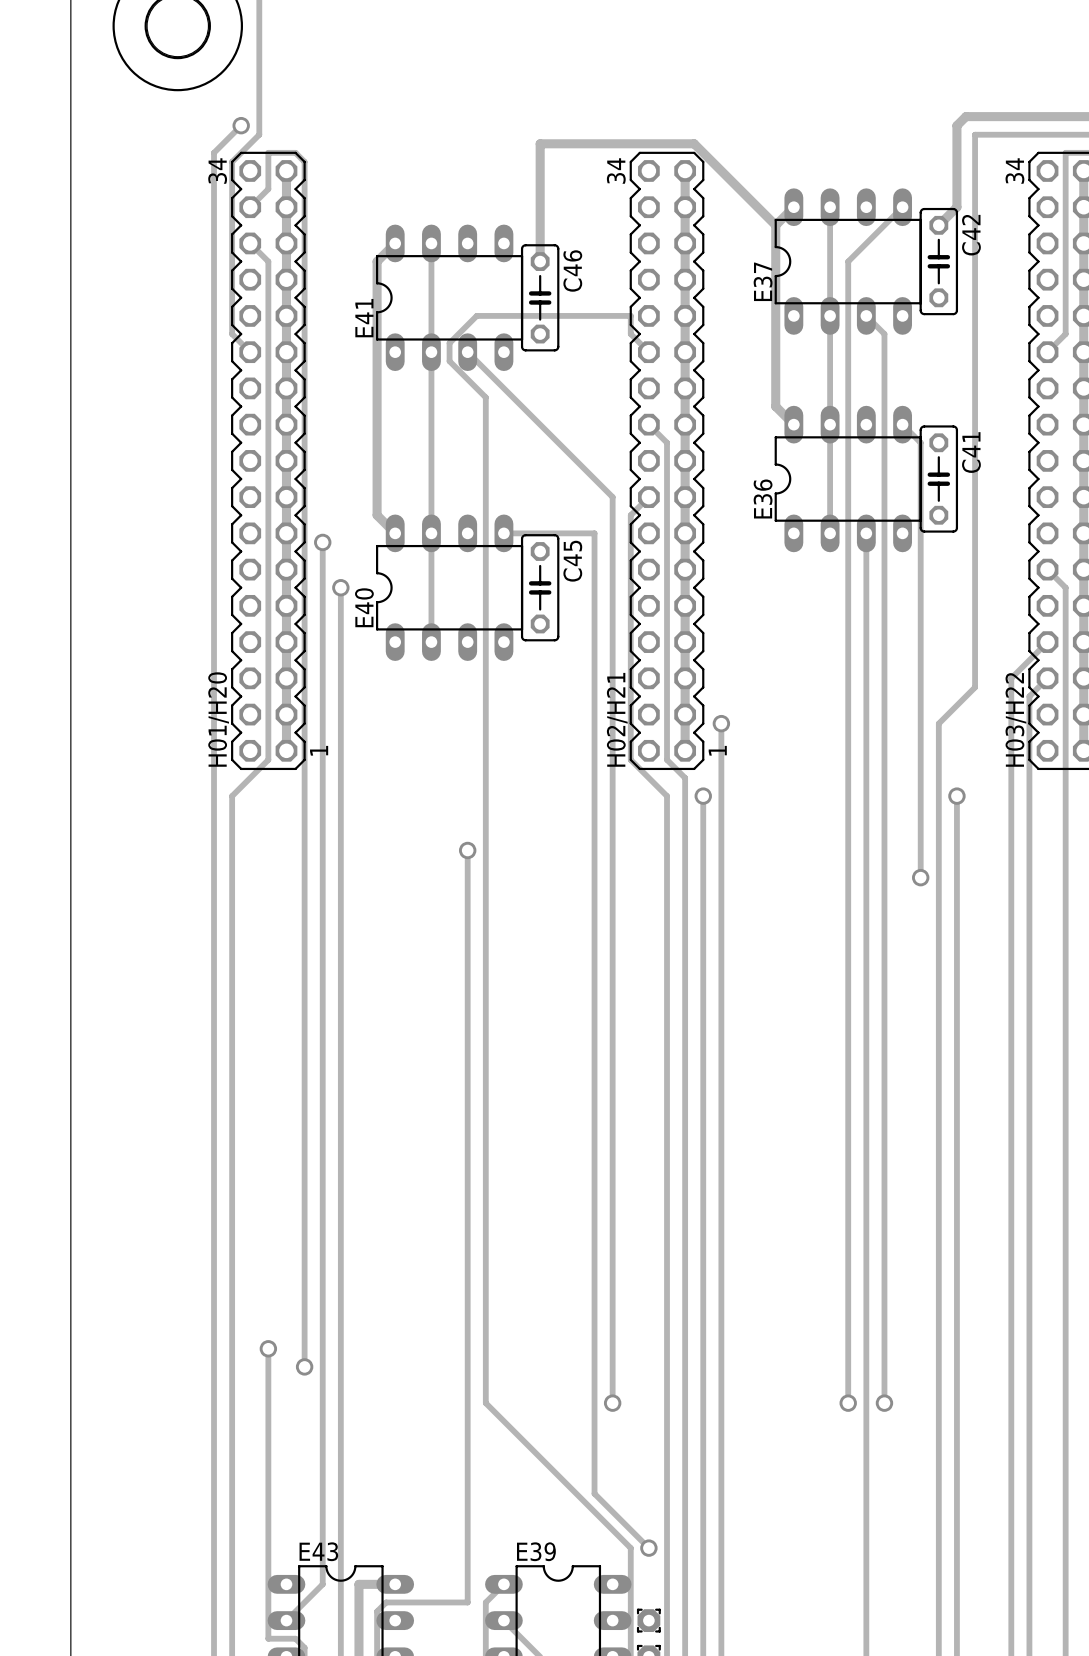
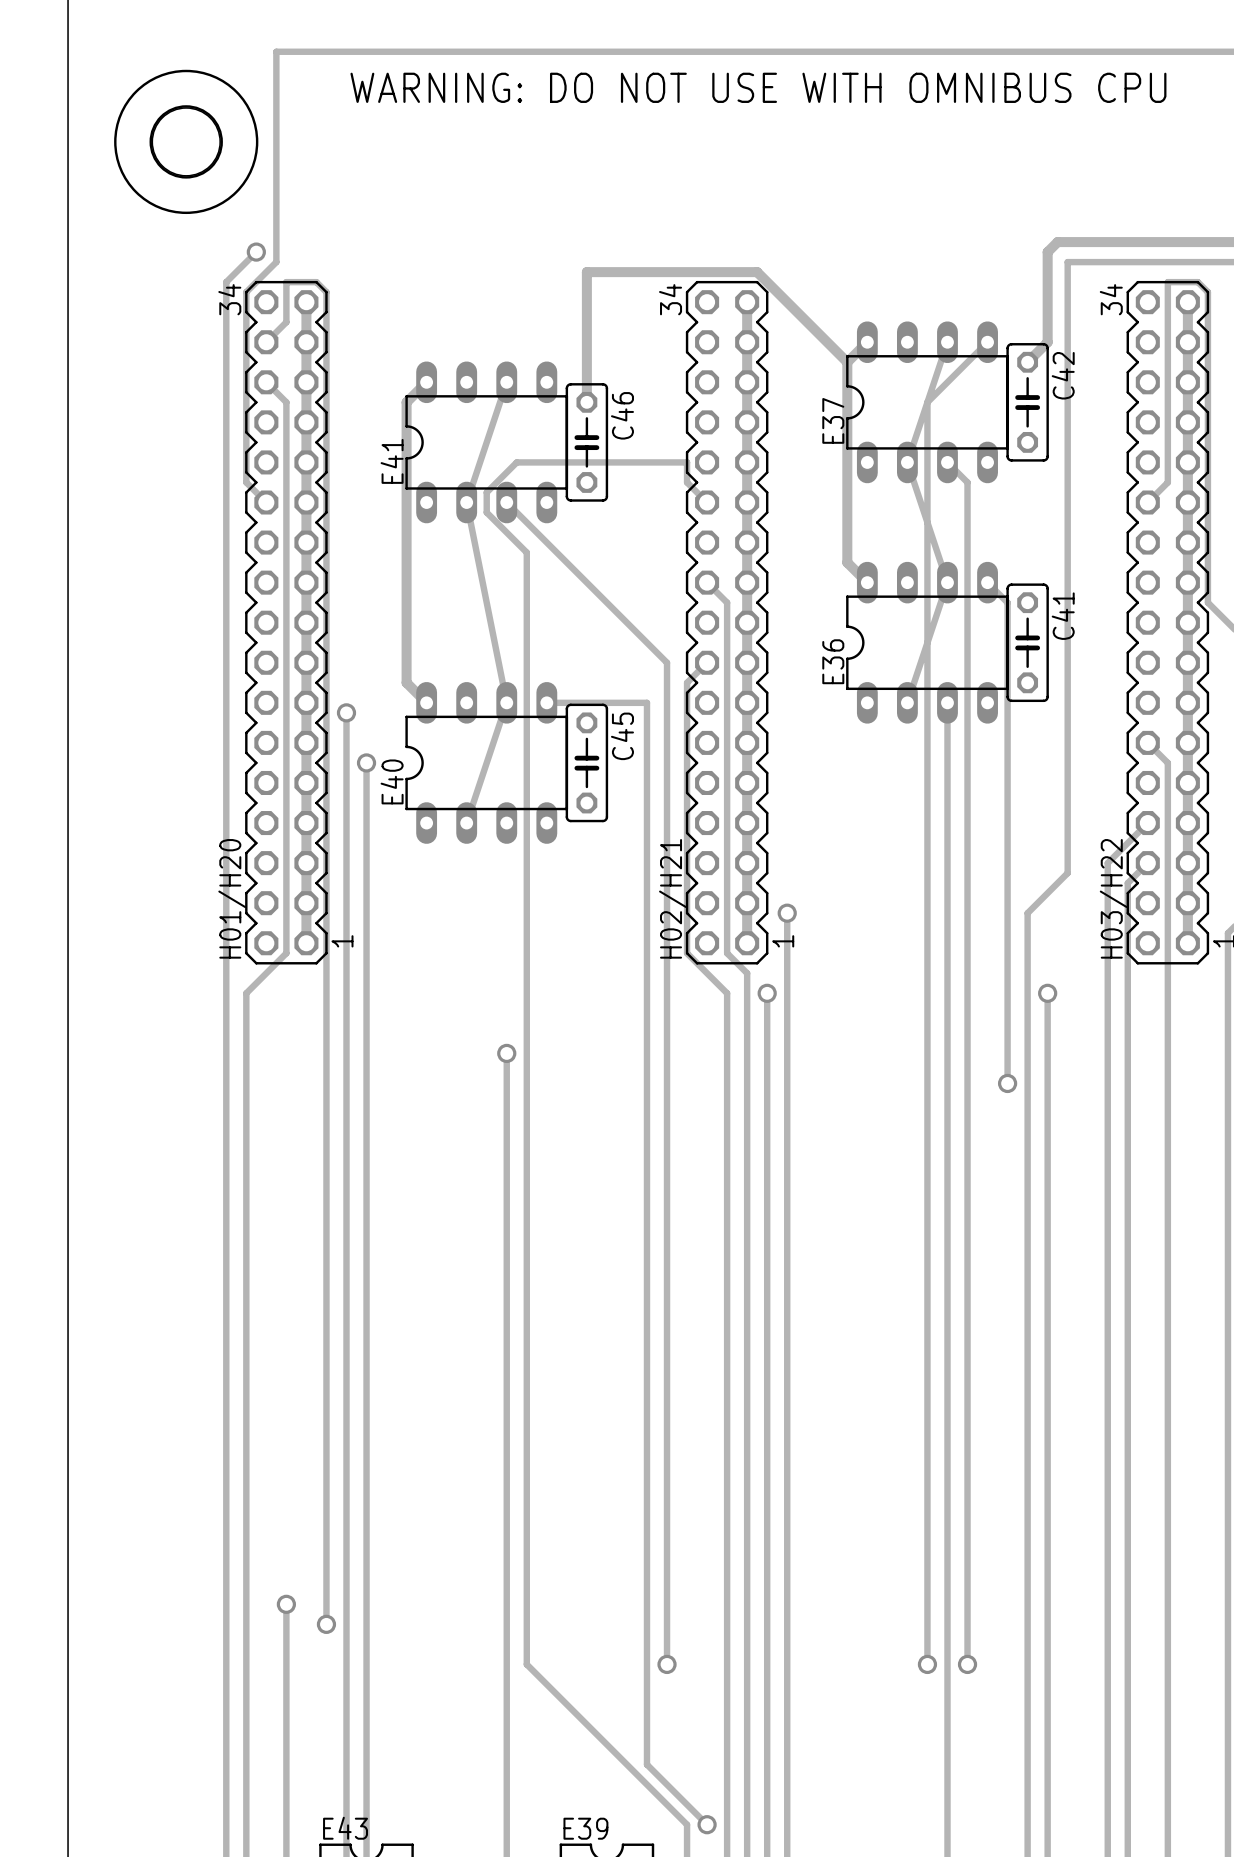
track: (830, 207) (830, 533) -> (947, 342) (907, 462) (947, 582) (907, 702)
track: (431, 243) (431, 642) -> (506, 382) (466, 502) (506, 702) (466, 823)

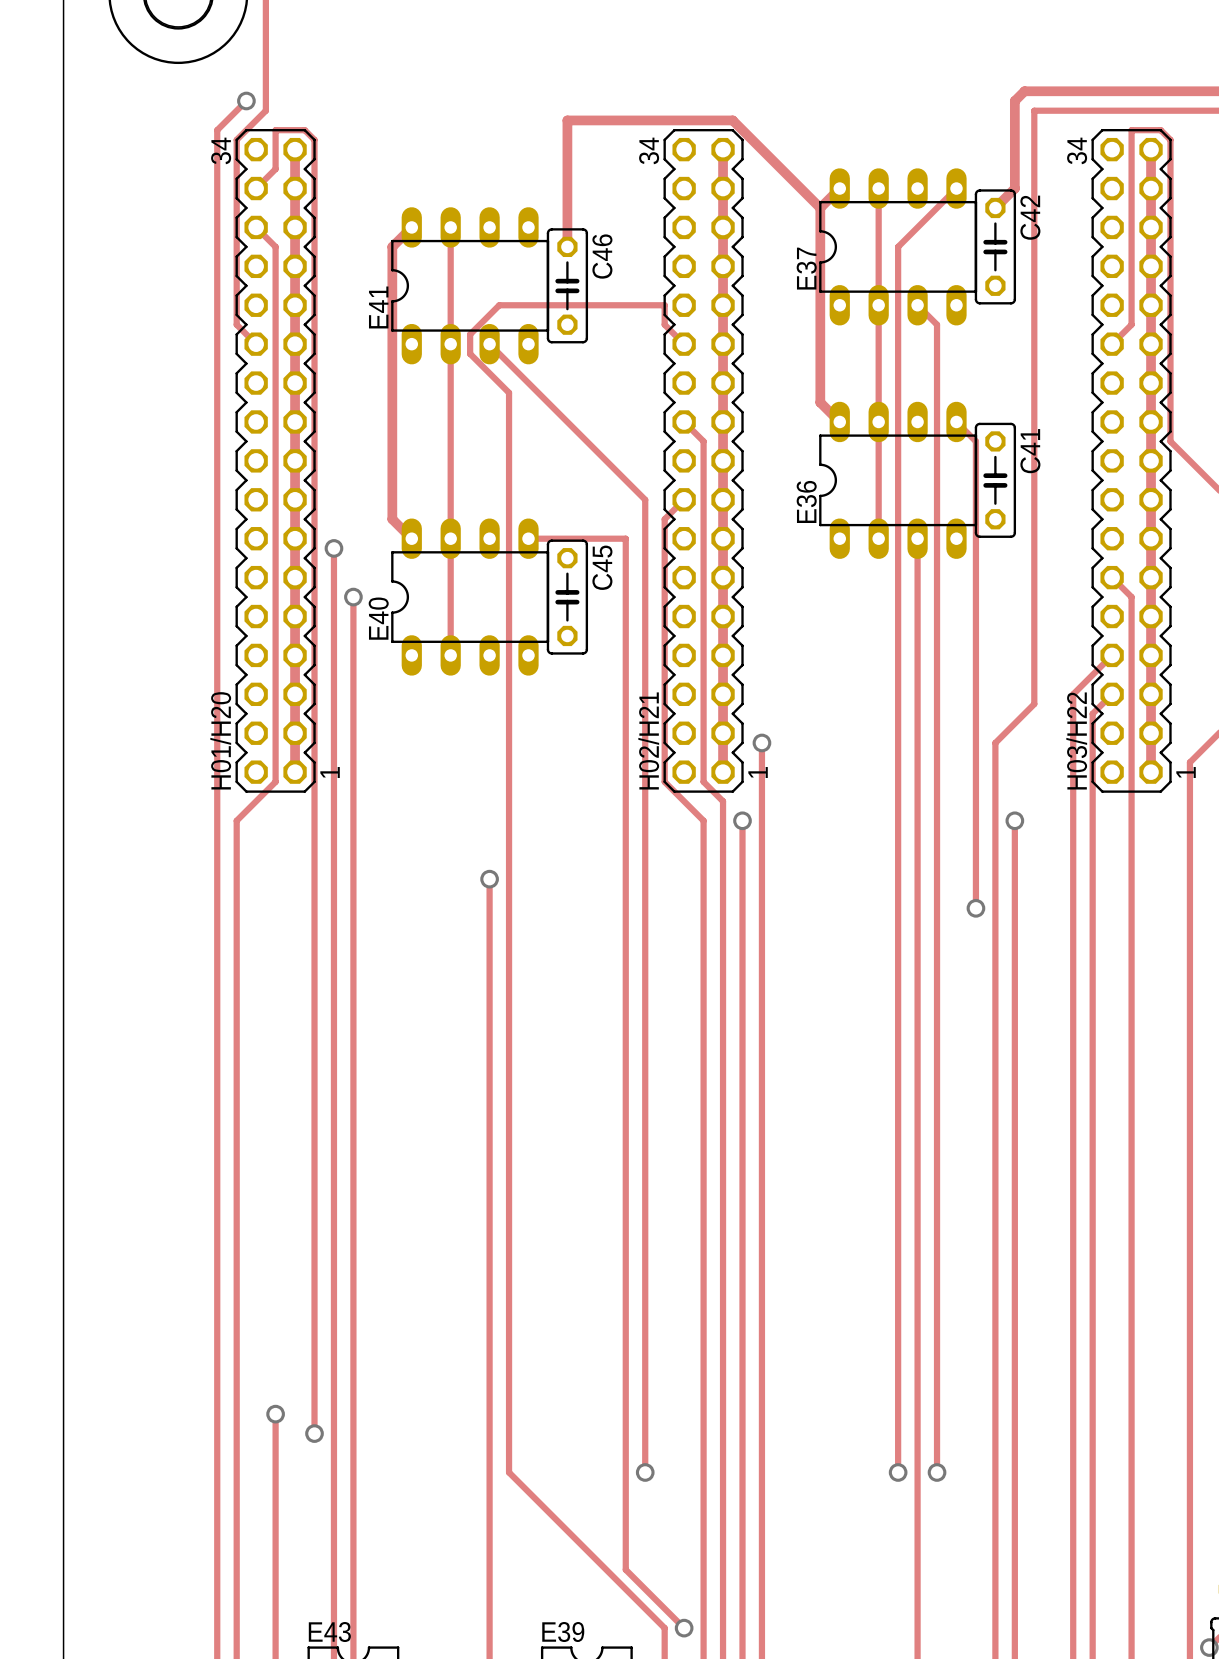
track: (947, 342) (907, 462) (947, 582) (907, 702) -> (878, 188) (878, 538)
track: (506, 382) (466, 502) (506, 702) (466, 823) -> (450, 227) (450, 655)

